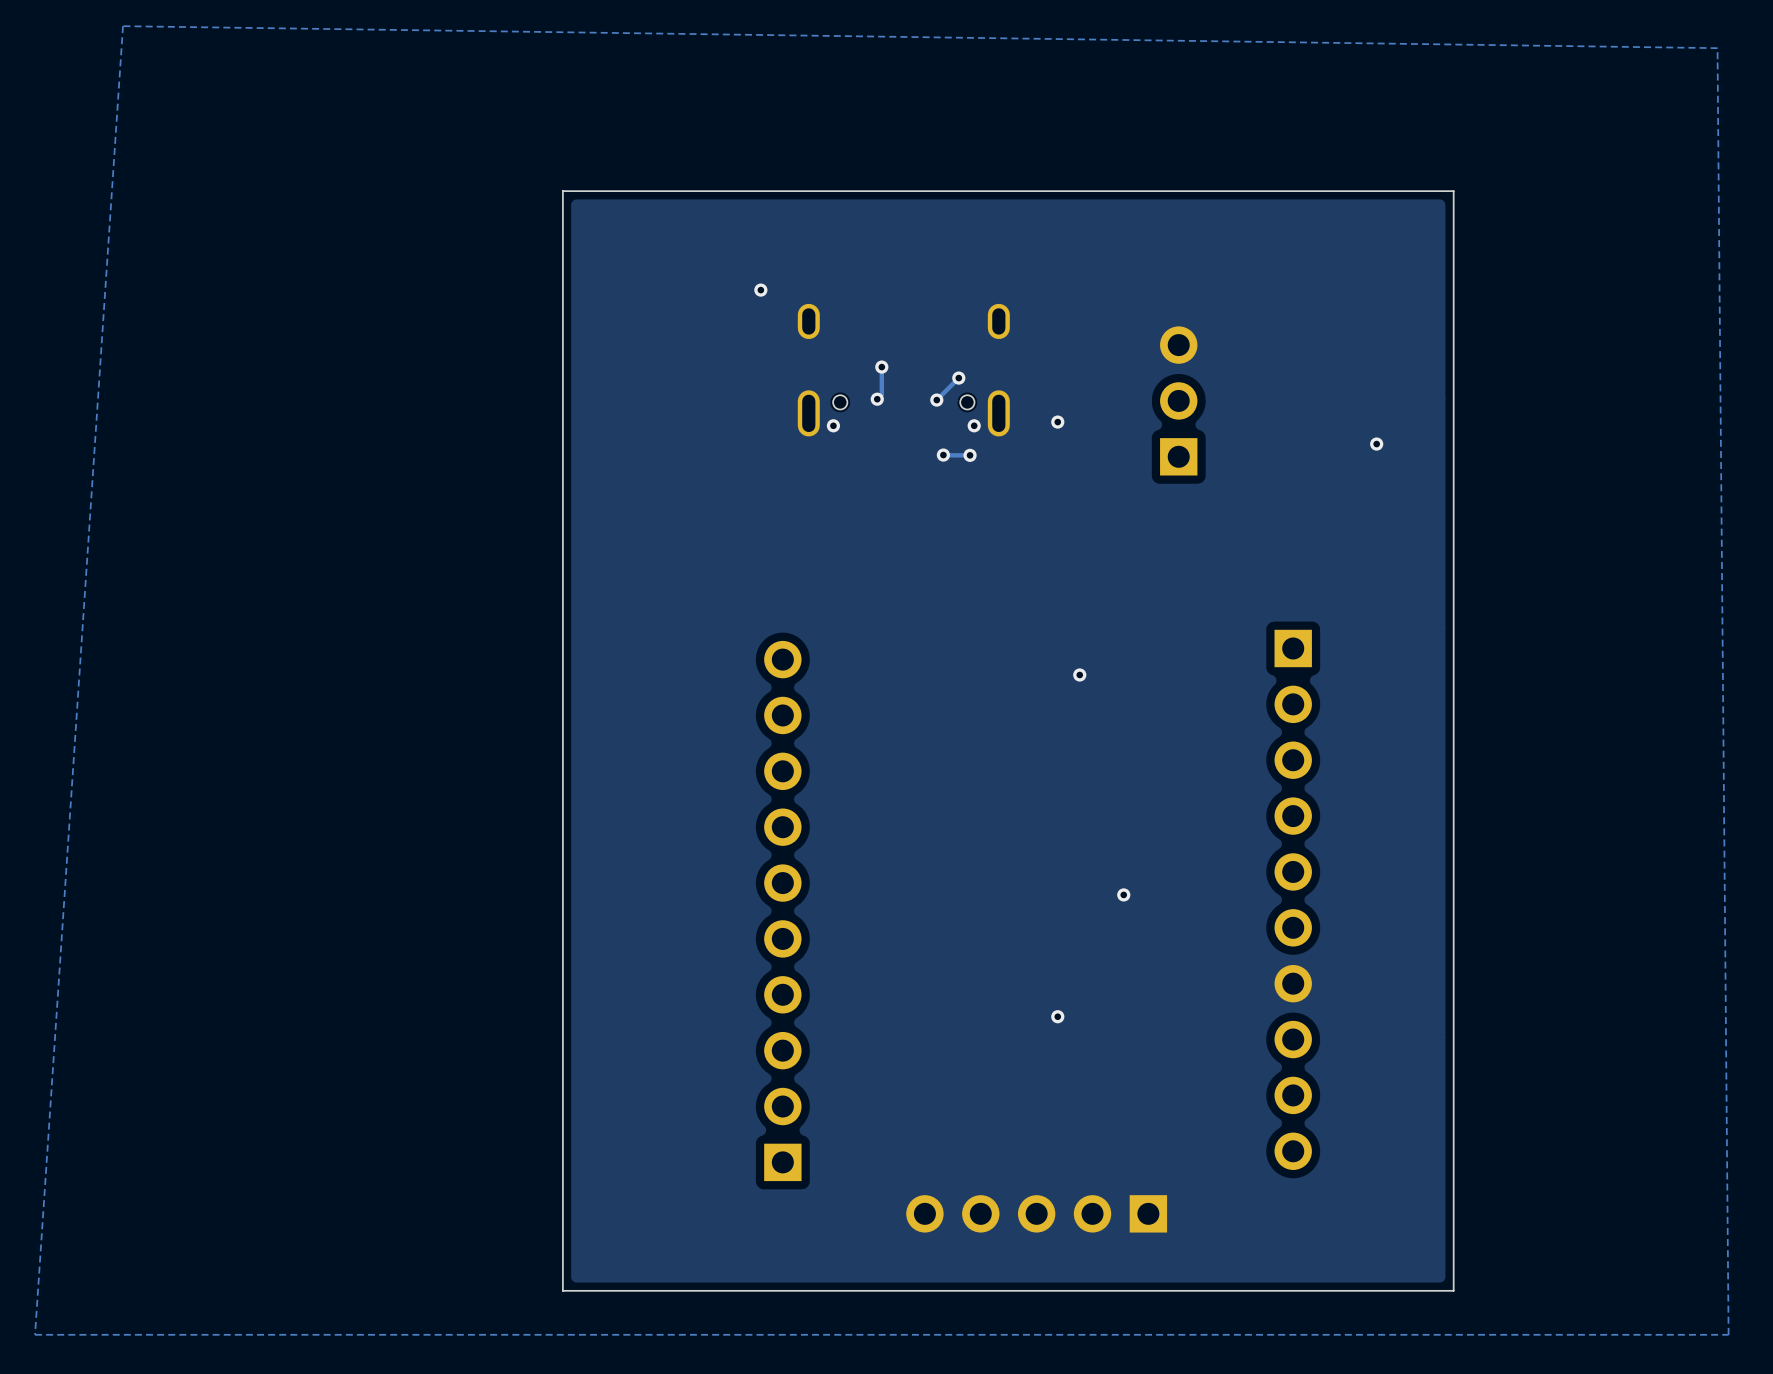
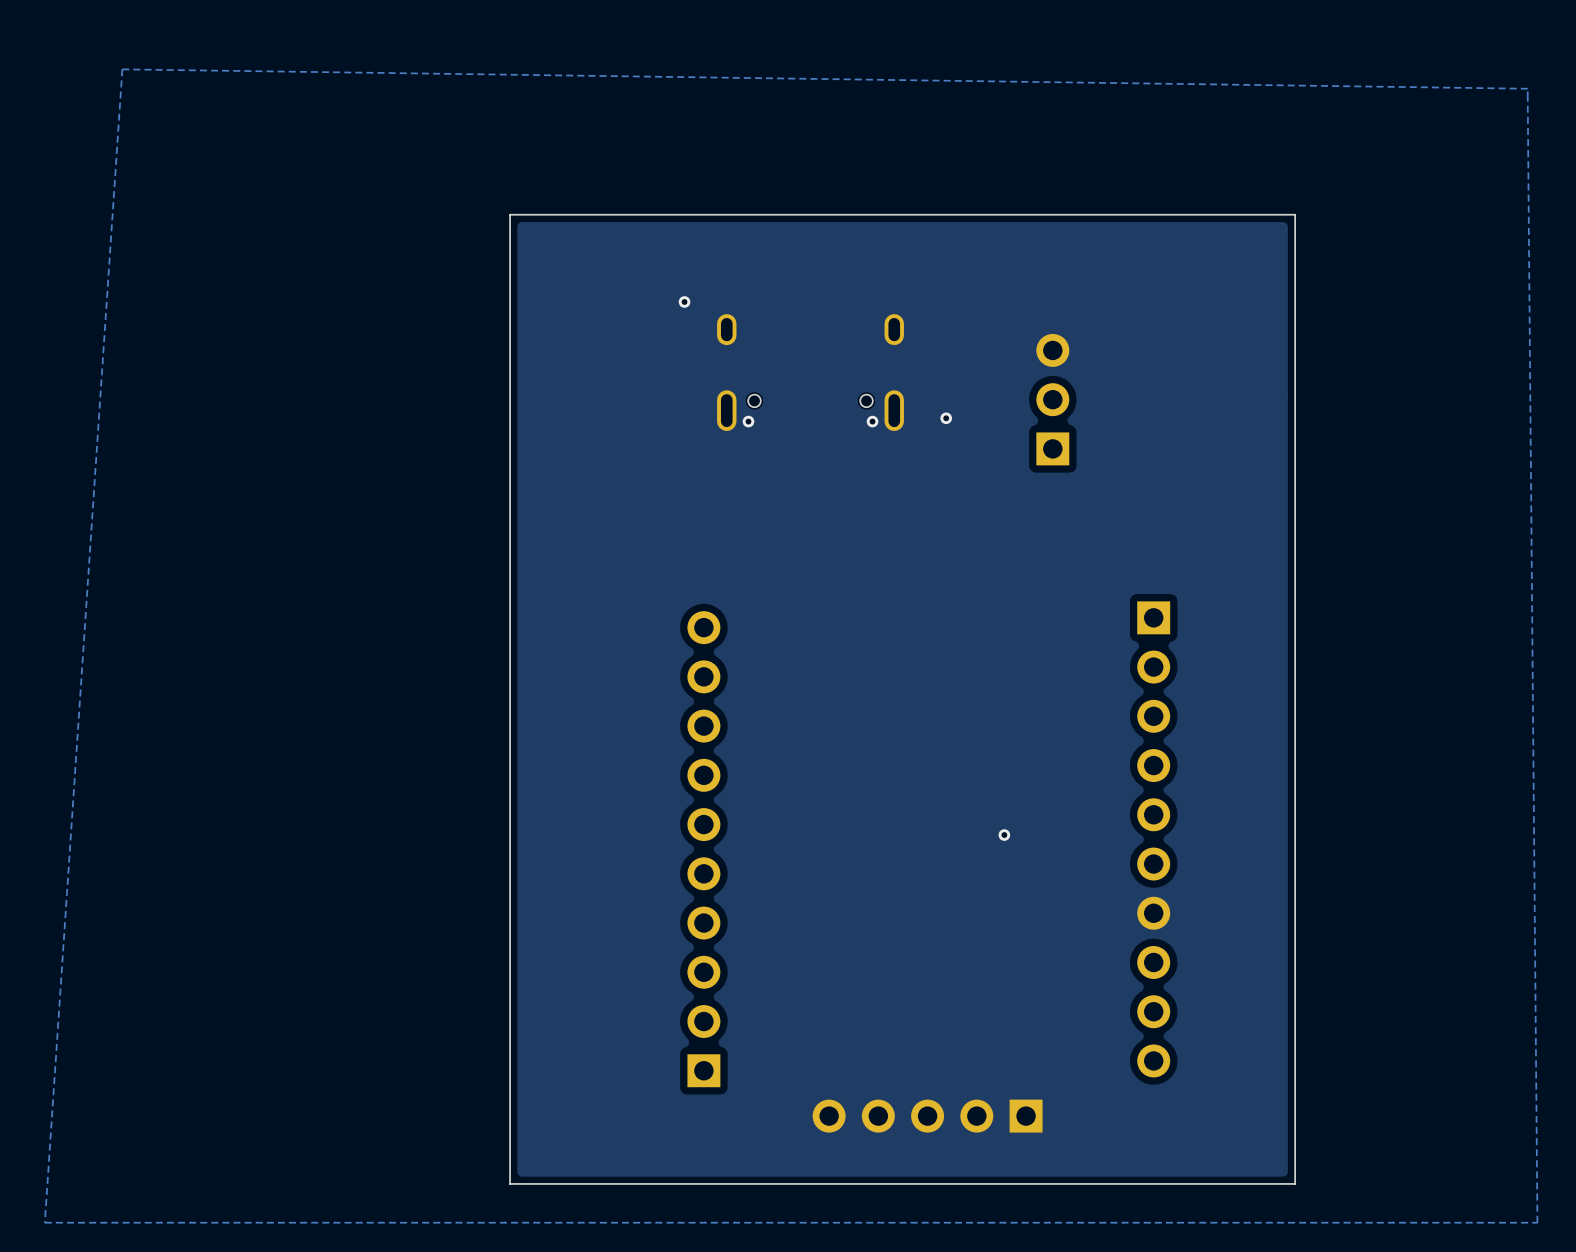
track: (881, 367) (881, 394) (877, 399) -> none
via: (881, 367) -> none
track: (958, 378) (936, 400) -> none
via: (958, 378) -> none
via: (877, 399) -> none
via: (936, 400) -> none
via: (1376, 444) -> none
via: (943, 455) -> none
track: (970, 455) (943, 455) -> none
via: (970, 455) -> none
via: (1079, 674) -> none
via: (1057, 1016) -> none

